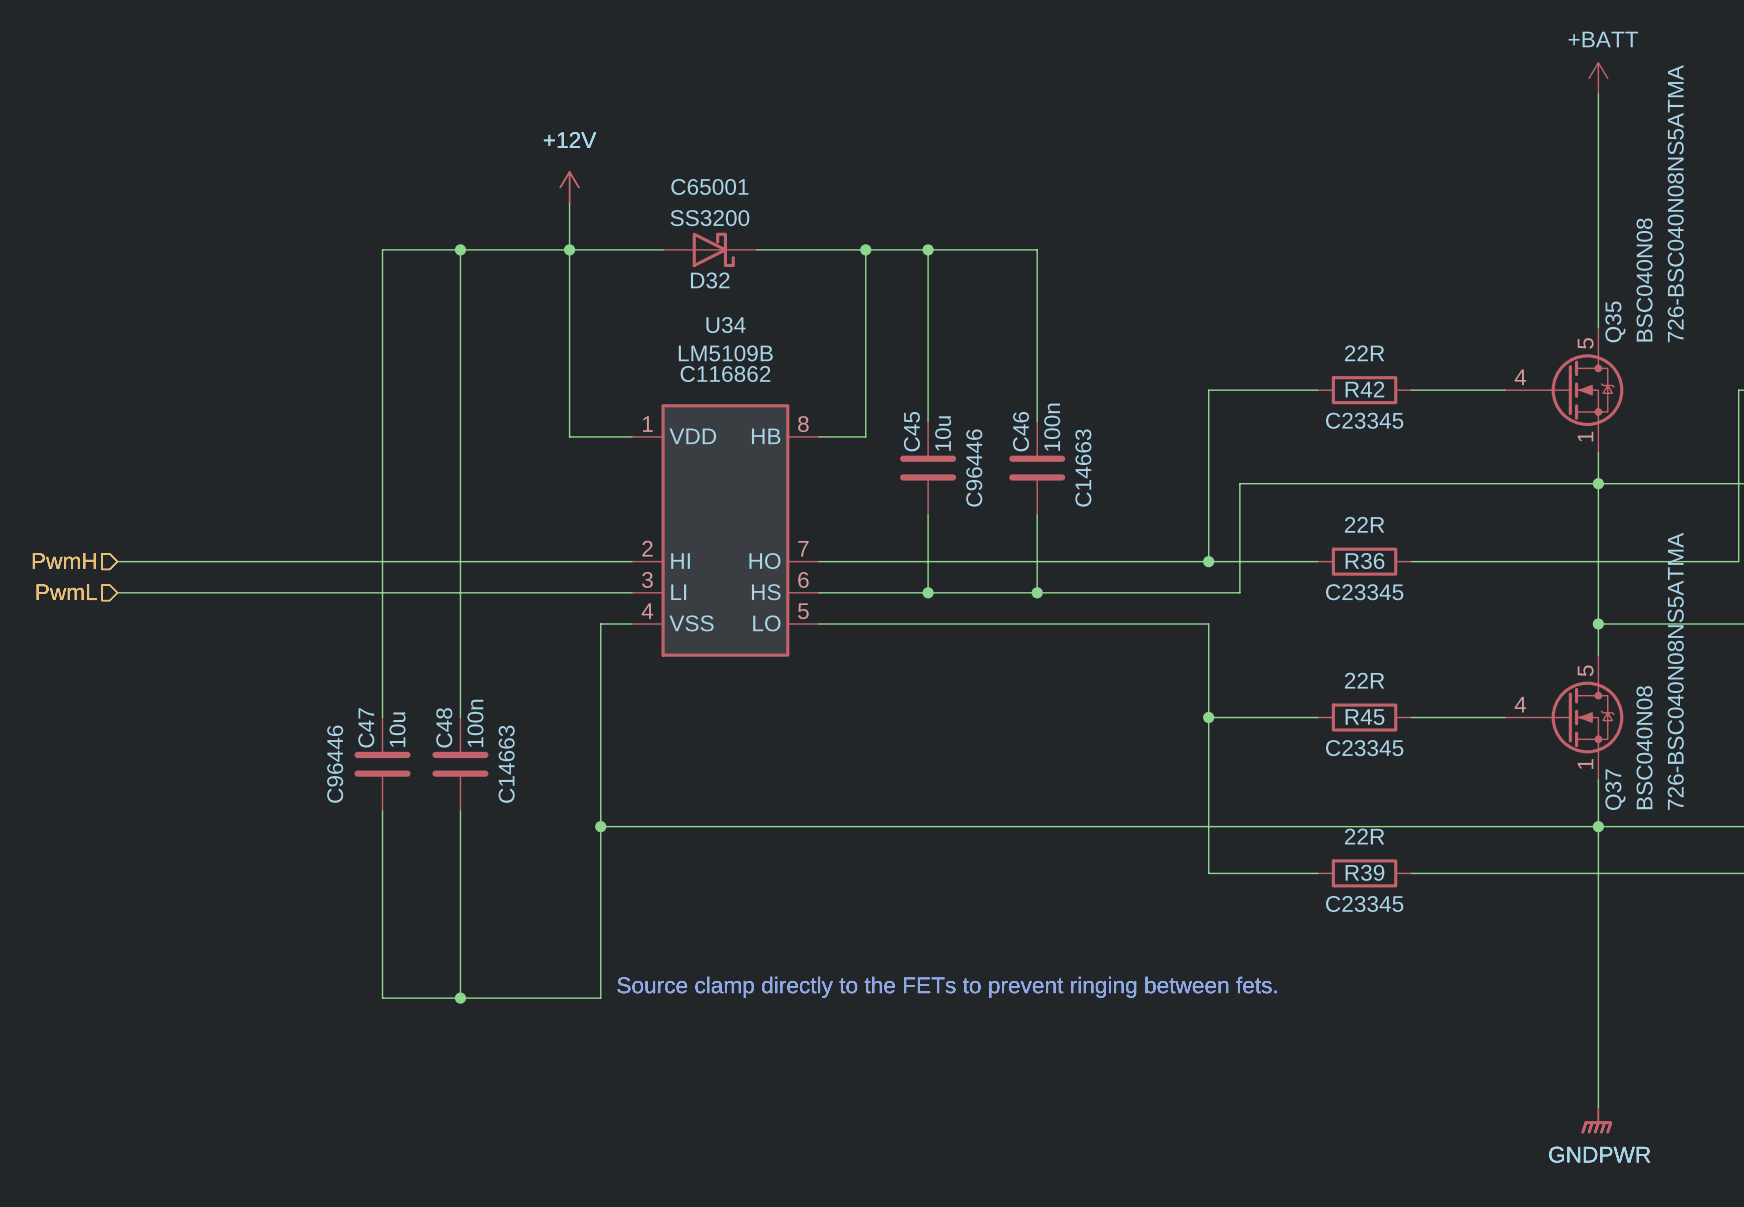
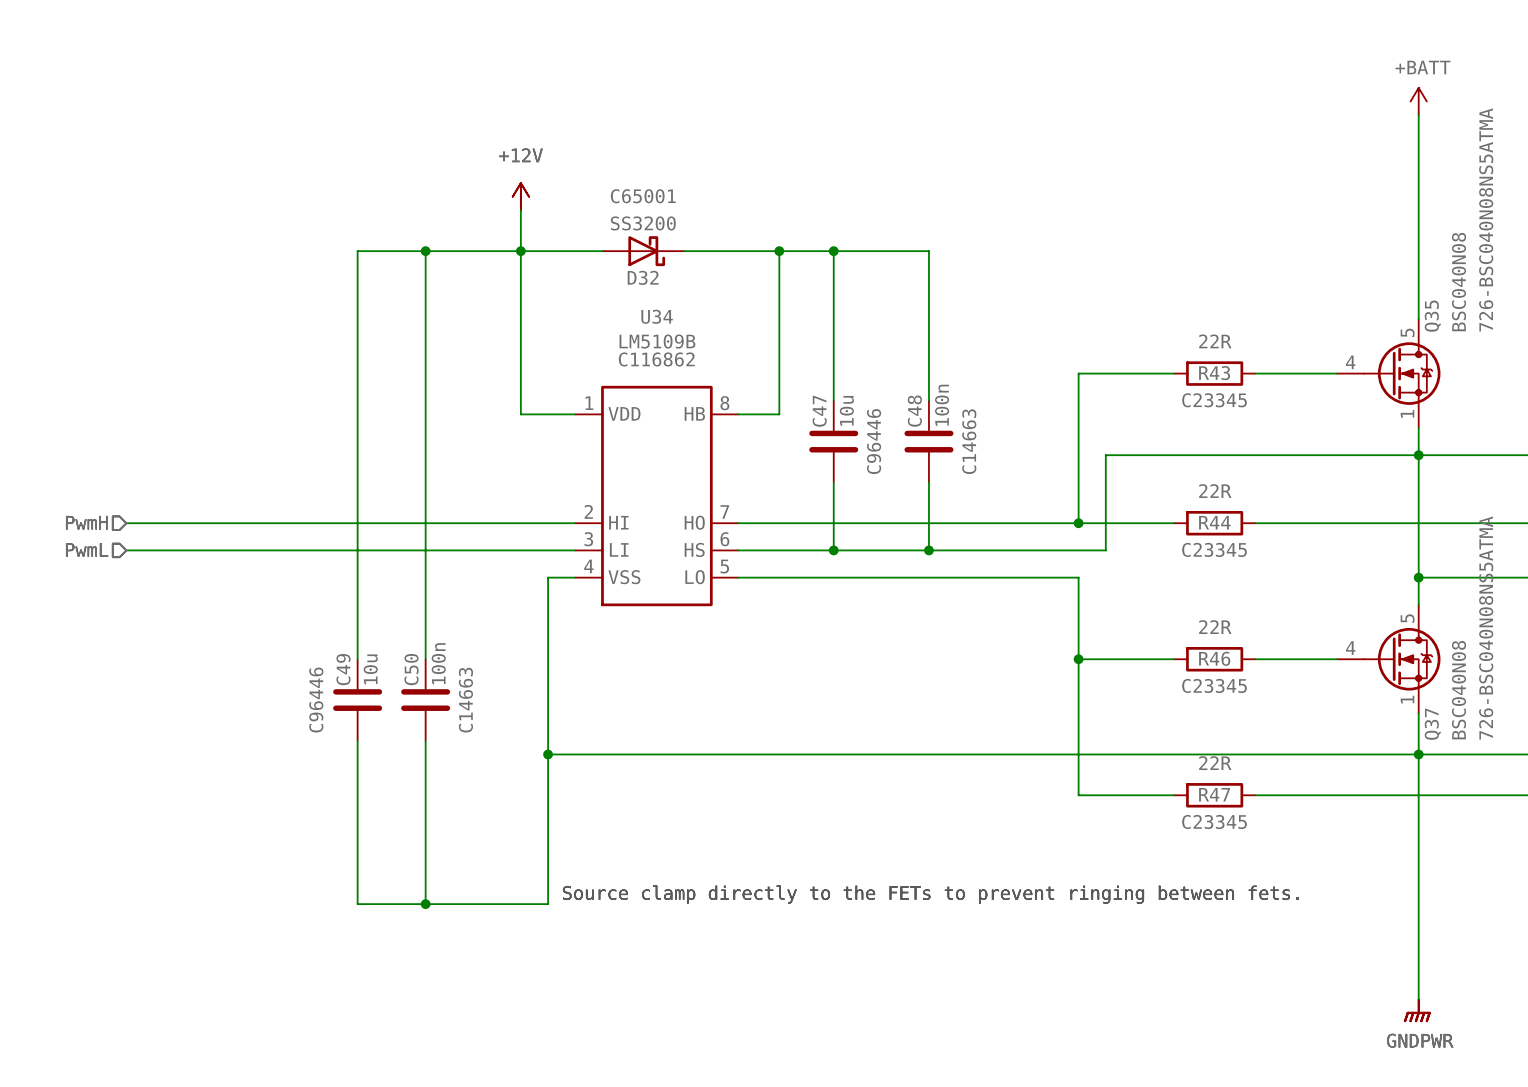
R42 name: R42 (1364, 389) -> R43 (1214, 373)
C45 name: C45 (911, 431) -> C47 (819, 411)
C46 name: C46 (1021, 431) -> C48 (914, 411)
R36 name: R36 (1364, 561) -> R44 (1214, 522)
R45 name: R45 (1365, 717) -> R46 (1214, 658)
C47 name: C47 (366, 727) -> C49 (343, 669)
C48 name: C48 (444, 727) -> C50 (411, 669)
R39 name: R39 (1364, 872) -> R47 (1214, 794)

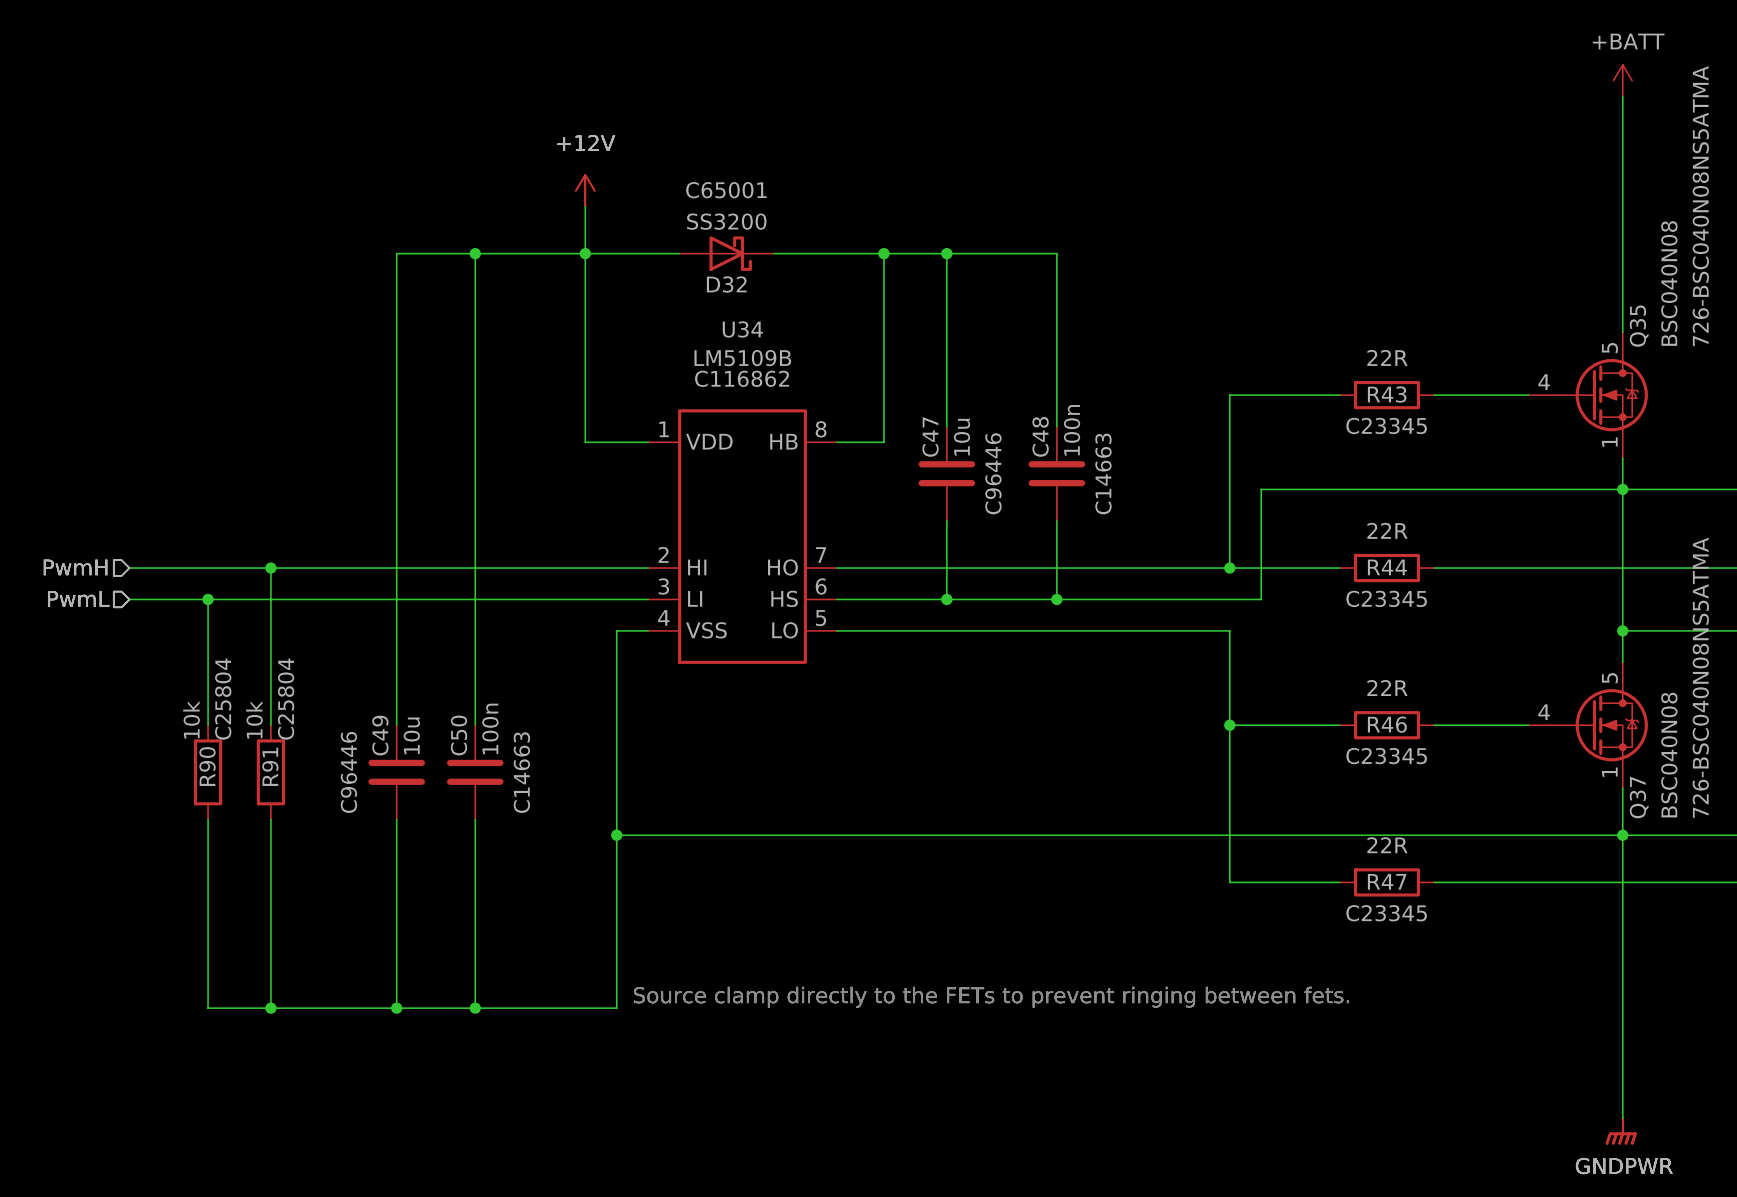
wire: none -> (270, 568) (270, 725)
junction: none -> (270, 568)
wire: none -> (208, 599) (208, 725)
junction: none -> (208, 599)
R90: none -> 10k (208, 772)
R91: none -> 10k (270, 772)
wire: none -> (208, 819) (208, 1008) (396, 1008)
wire: none -> (270, 819) (270, 1008)
junction: none -> (270, 1008)
junction: none -> (396, 1008)

